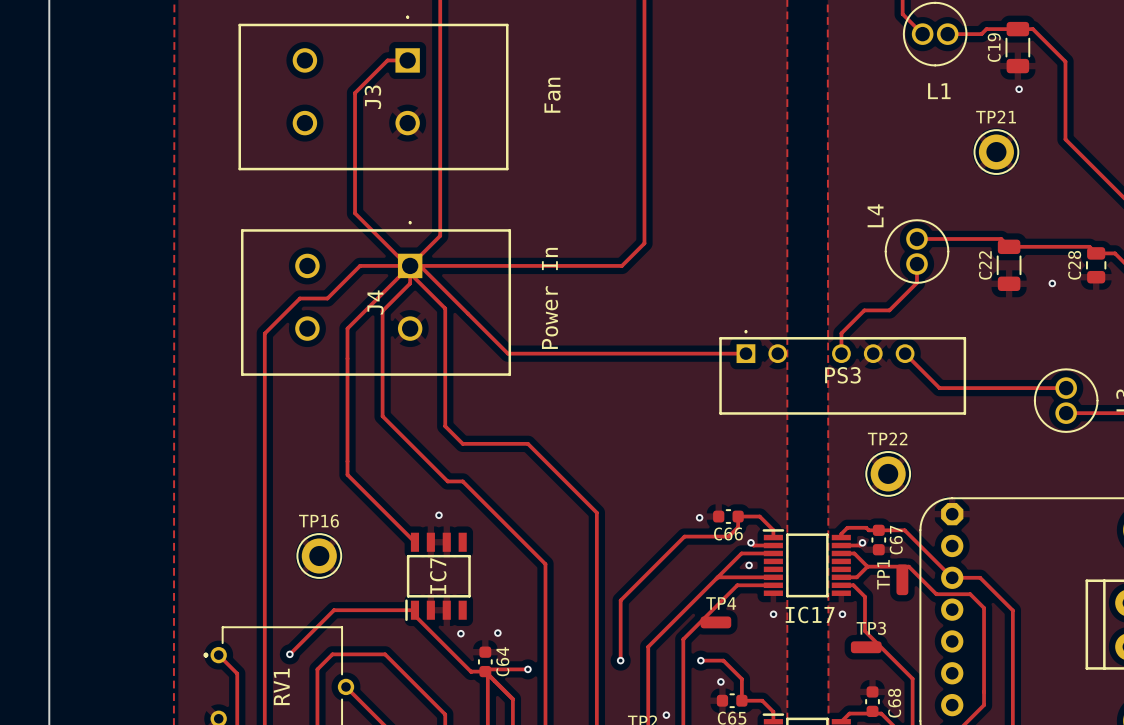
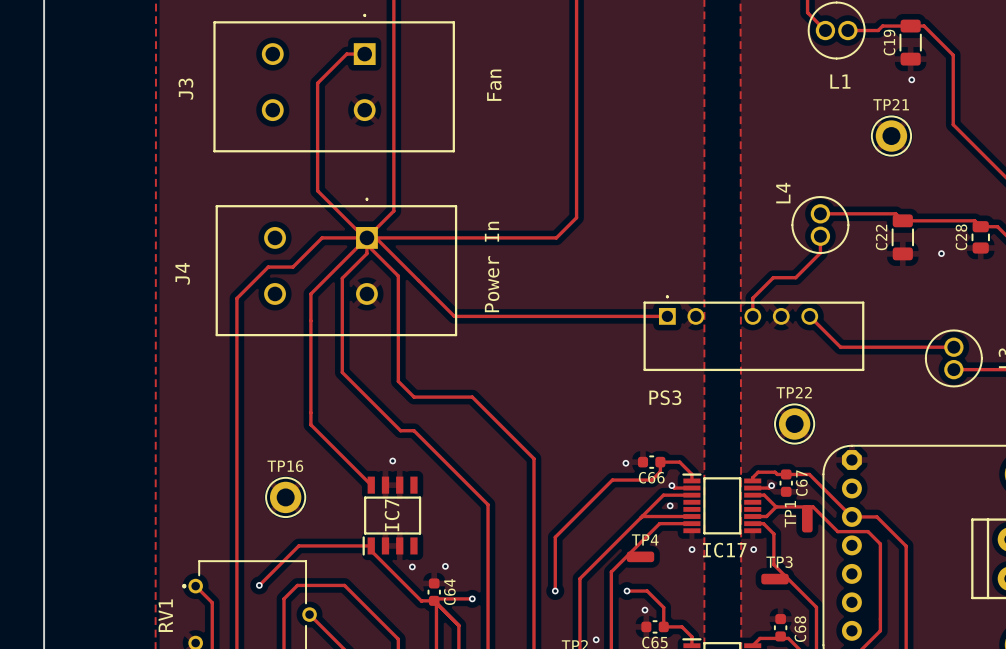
J3 name position: J3 (372, 97) -> J3 (185, 89)
J4 name position: J4 (375, 302) -> J4 (182, 273)
PS3 name position: PS3 (842, 375) -> PS3 (665, 397)
RV1 name position: RV1 (281, 686) -> RV1 (165, 615)

